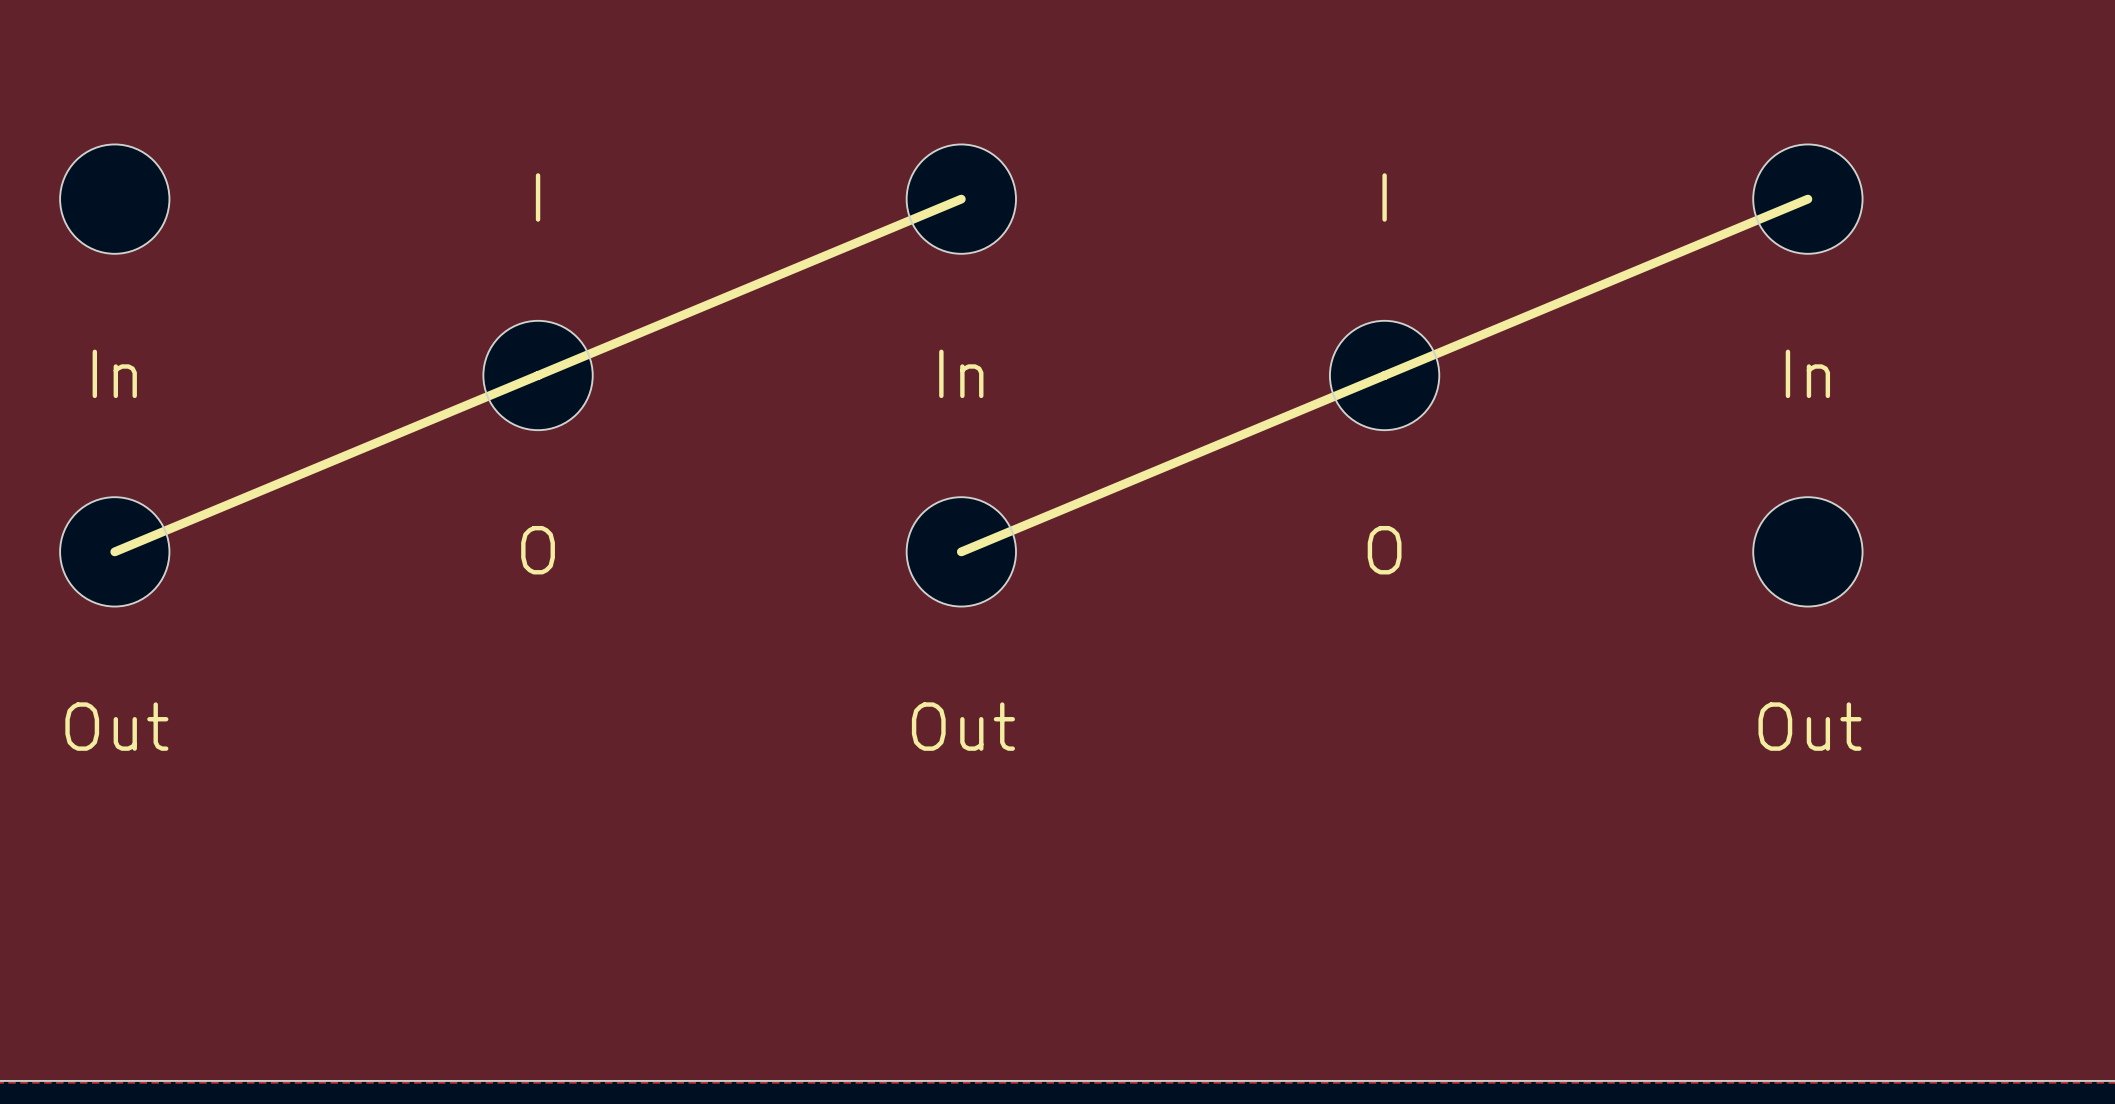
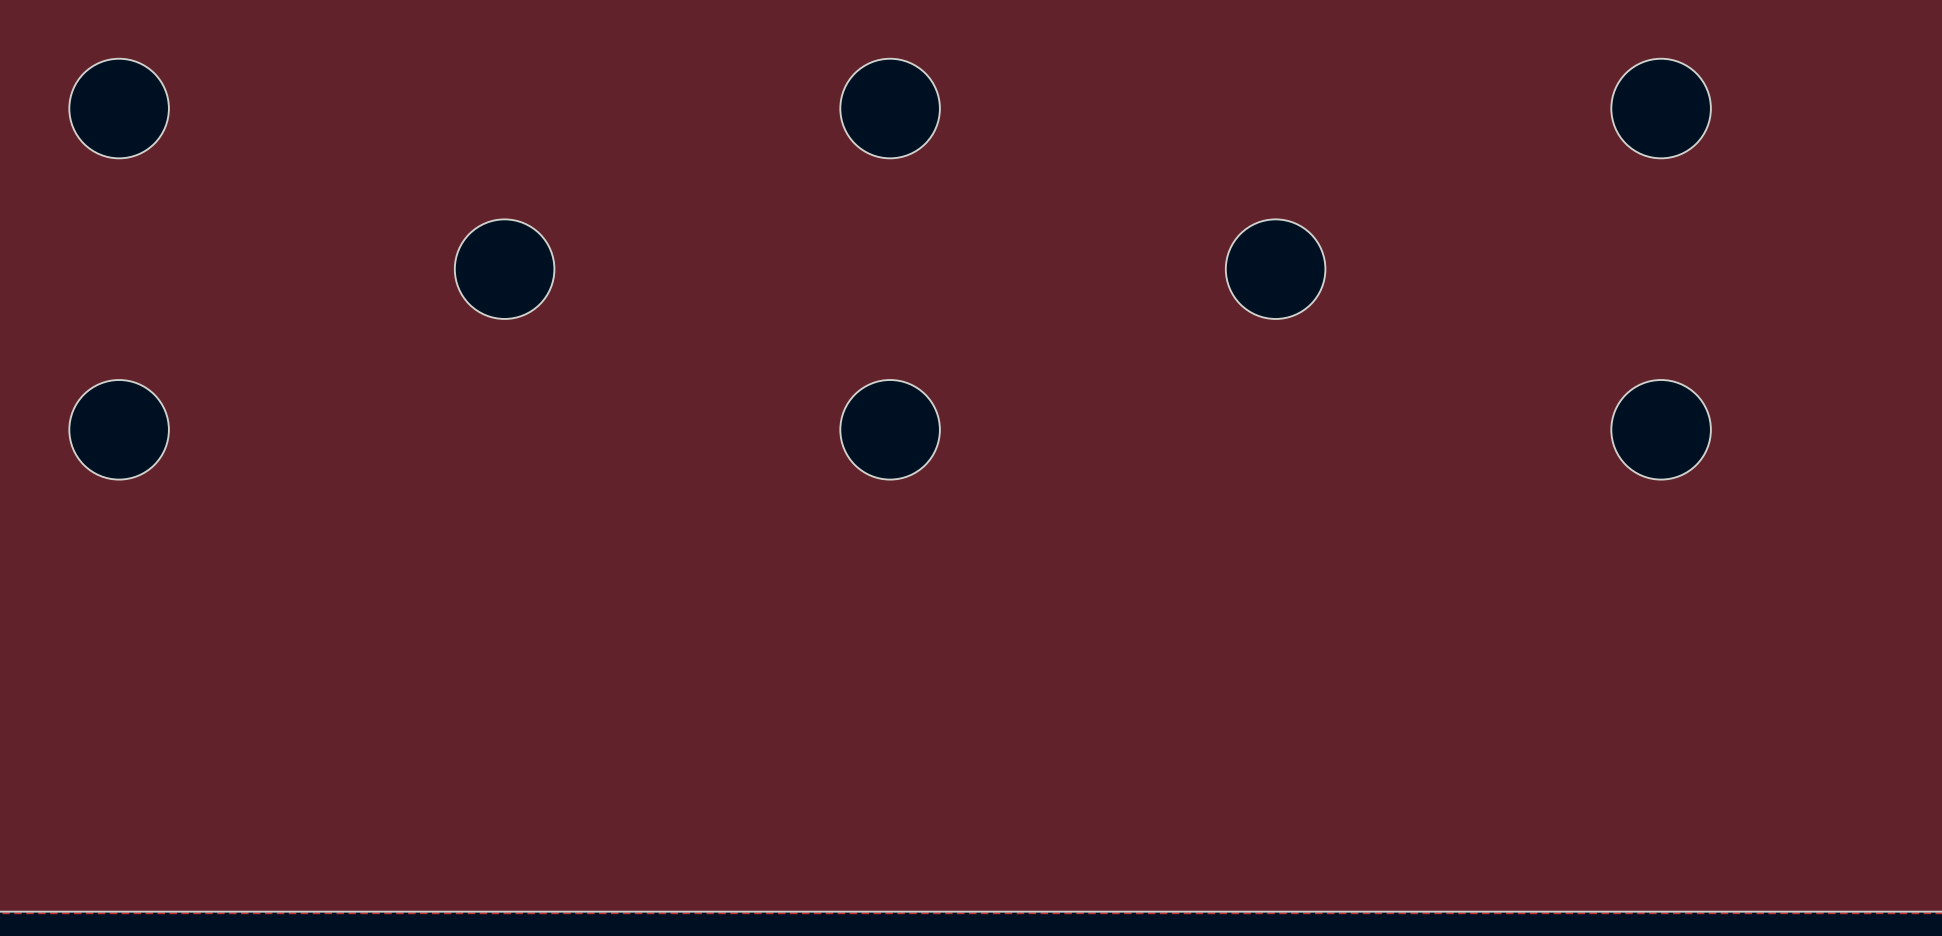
text: I (538, 197) -> none
text: I (1384, 197) -> none
line: (961, 199) (114, 551) -> none
line: (1807, 199) (961, 551) -> none
text: In (114, 373) -> none
text: In (961, 373) -> none
text: In (1807, 373) -> none
text: O (538, 550) -> none
text: O (1384, 550) -> none
text: Out (116, 726) -> none
text: Out (963, 726) -> none
text: Out (1809, 726) -> none

